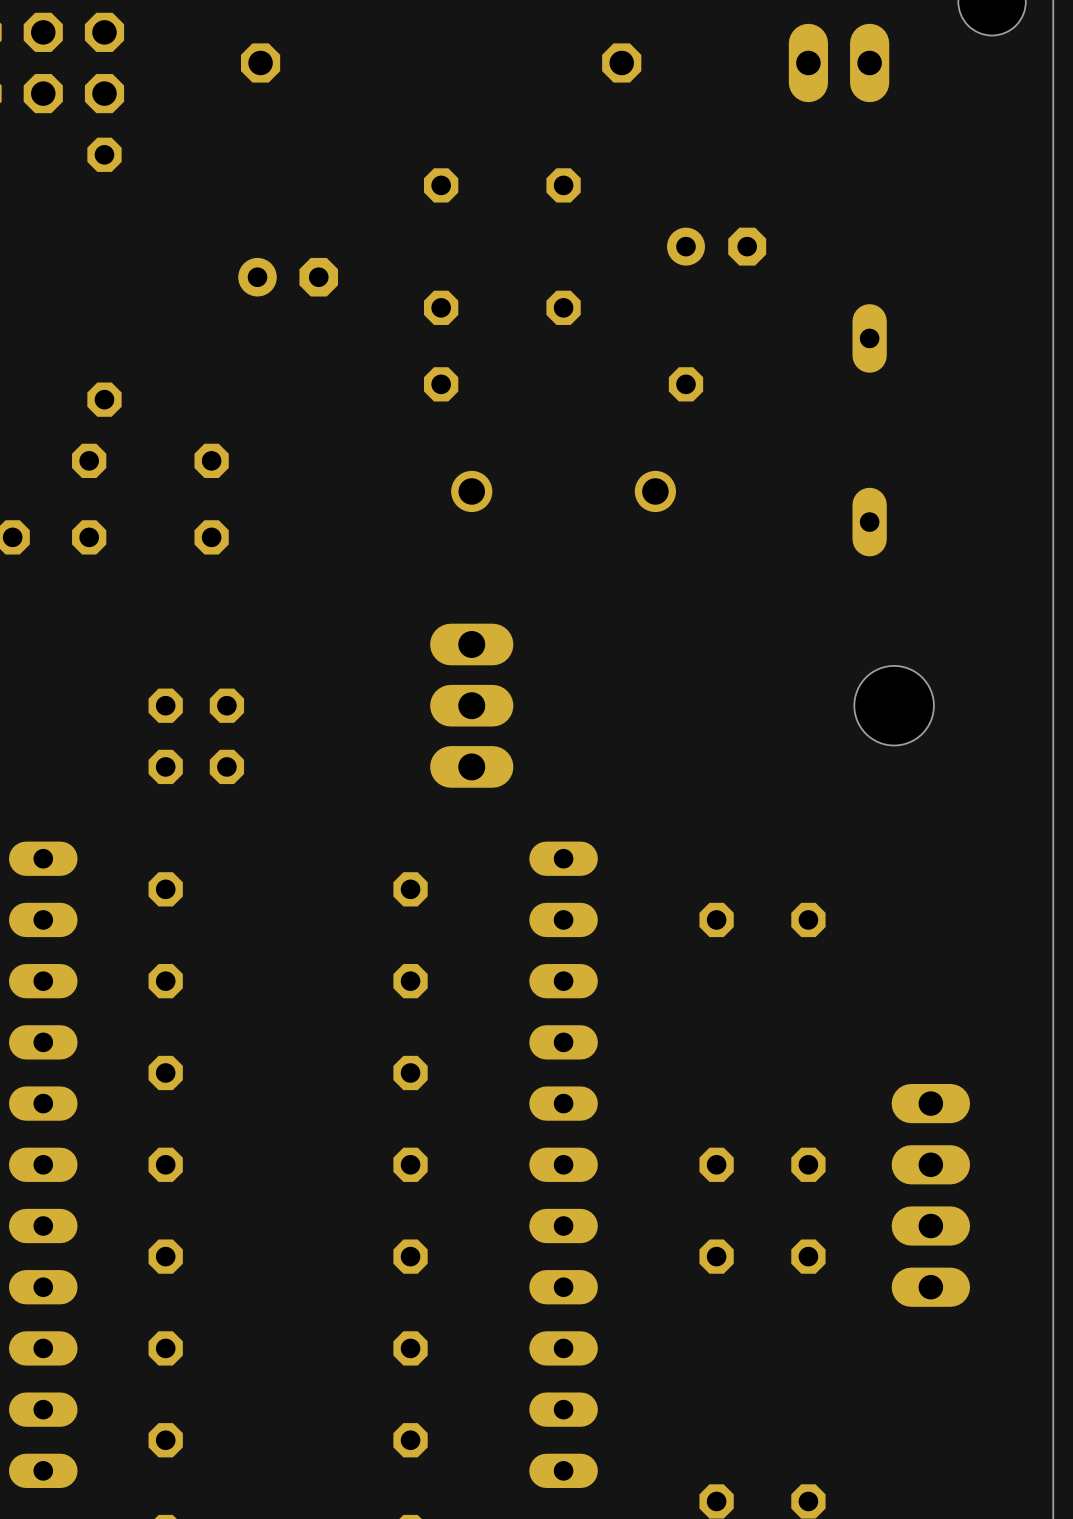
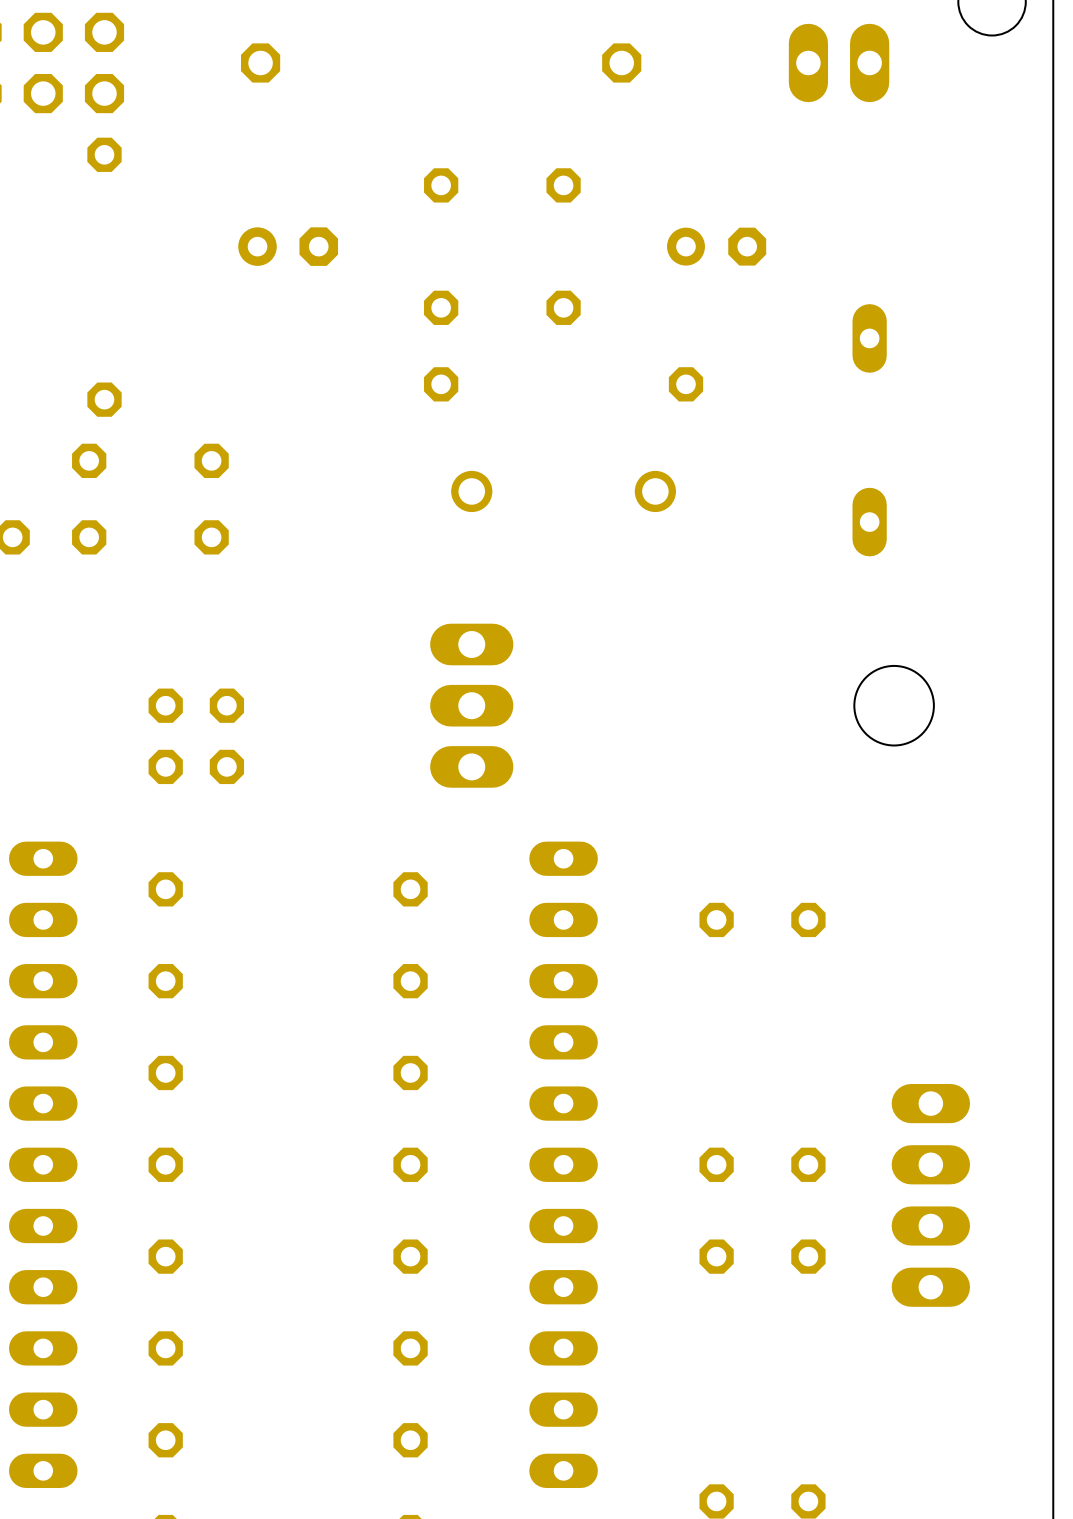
part position: (288, 277) -> (288, 246)

